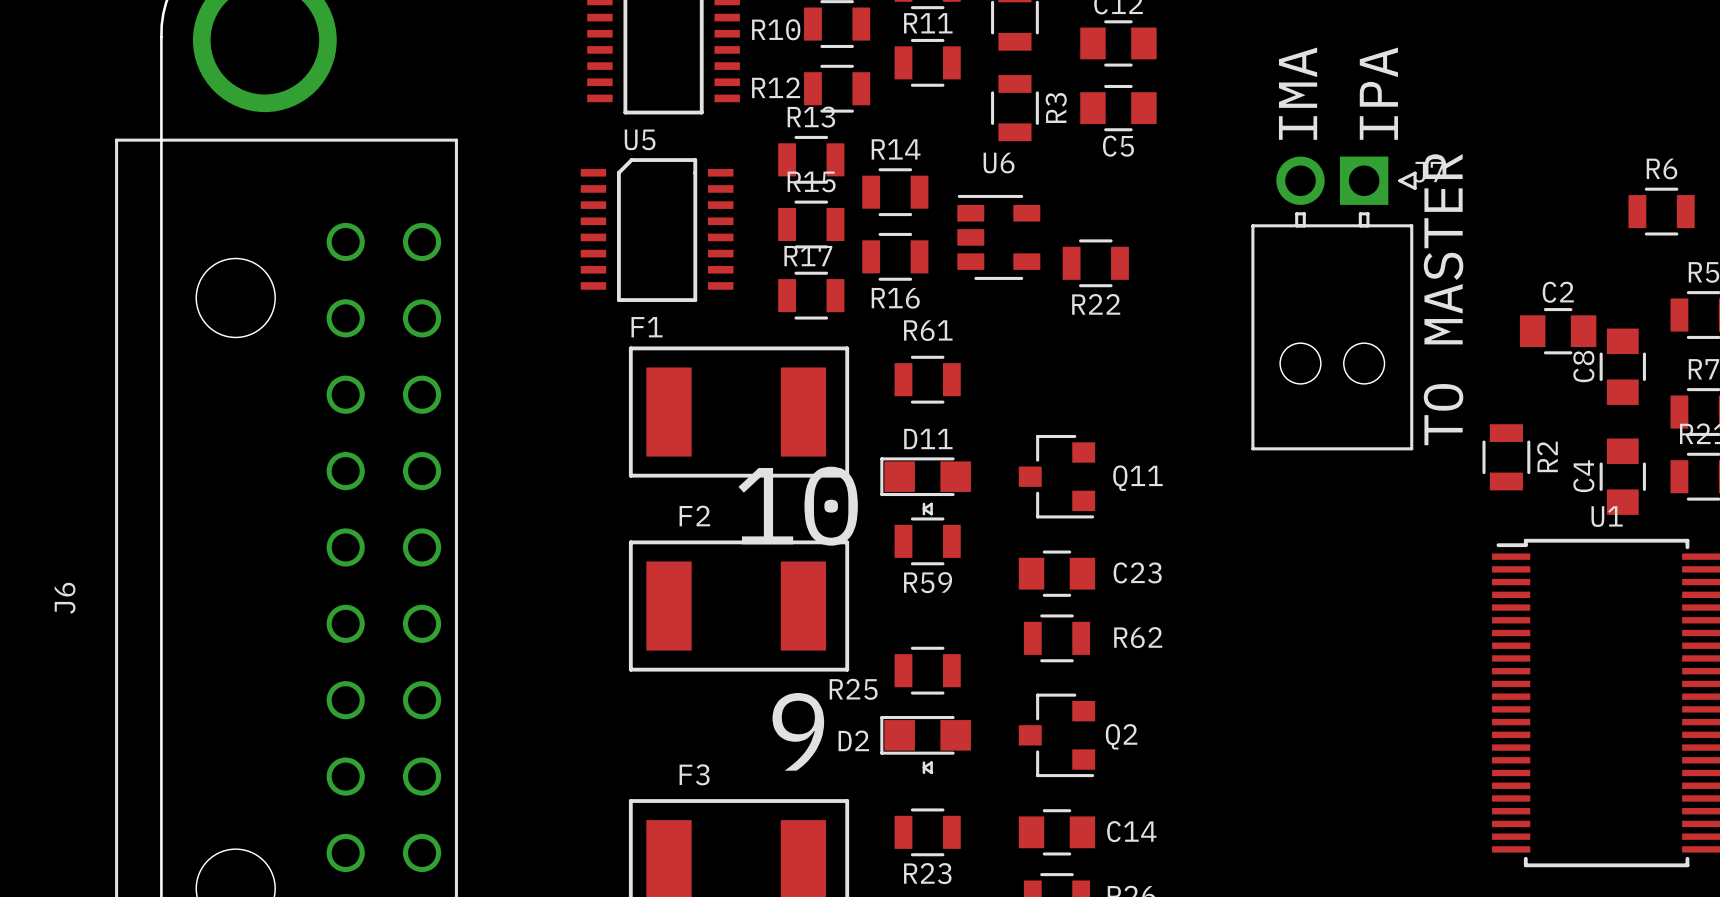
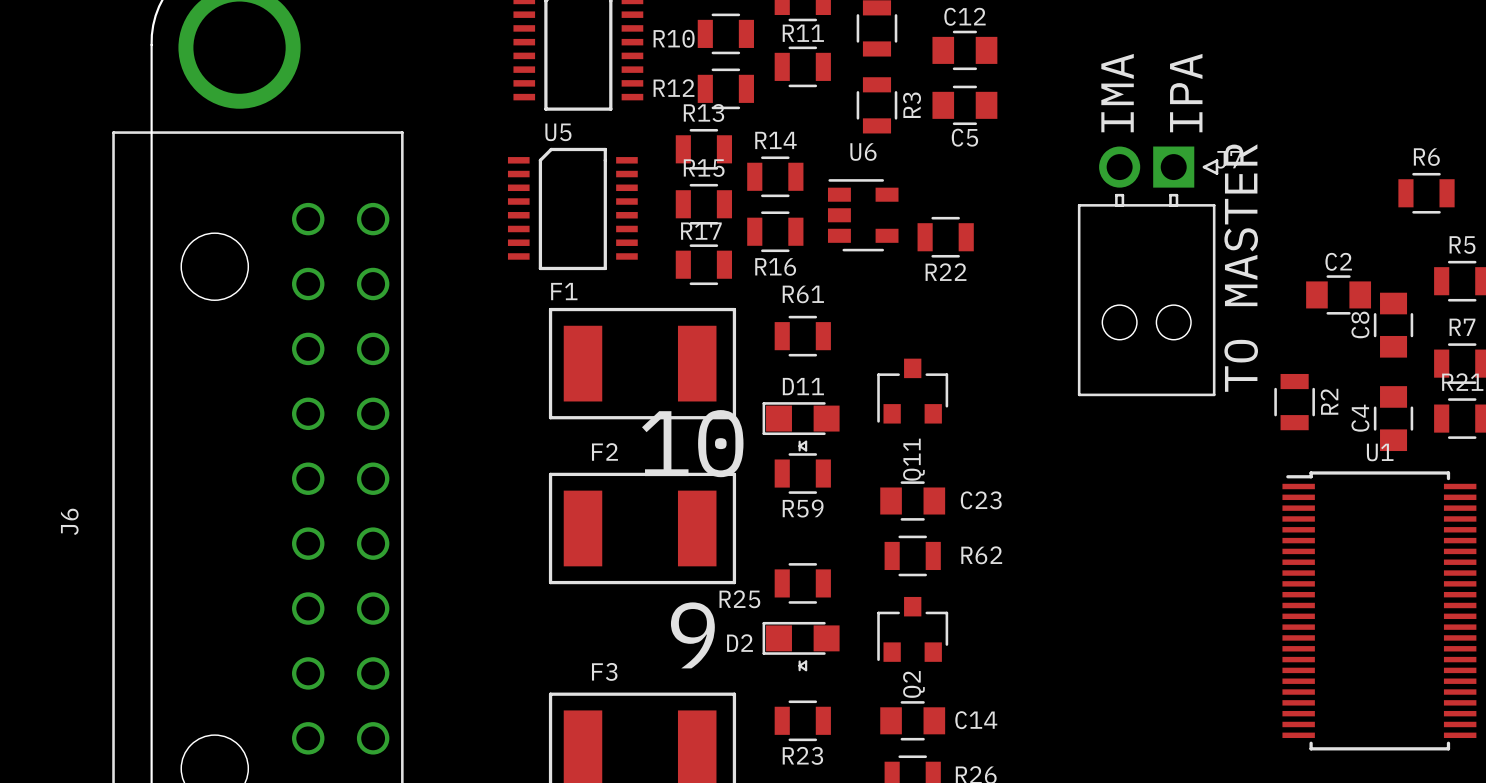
Q11 rotation: 0° (1056, 476) -> 90° clockwise (912, 391)
Q2 rotation: 0° (1056, 735) -> 90° clockwise (912, 629)

